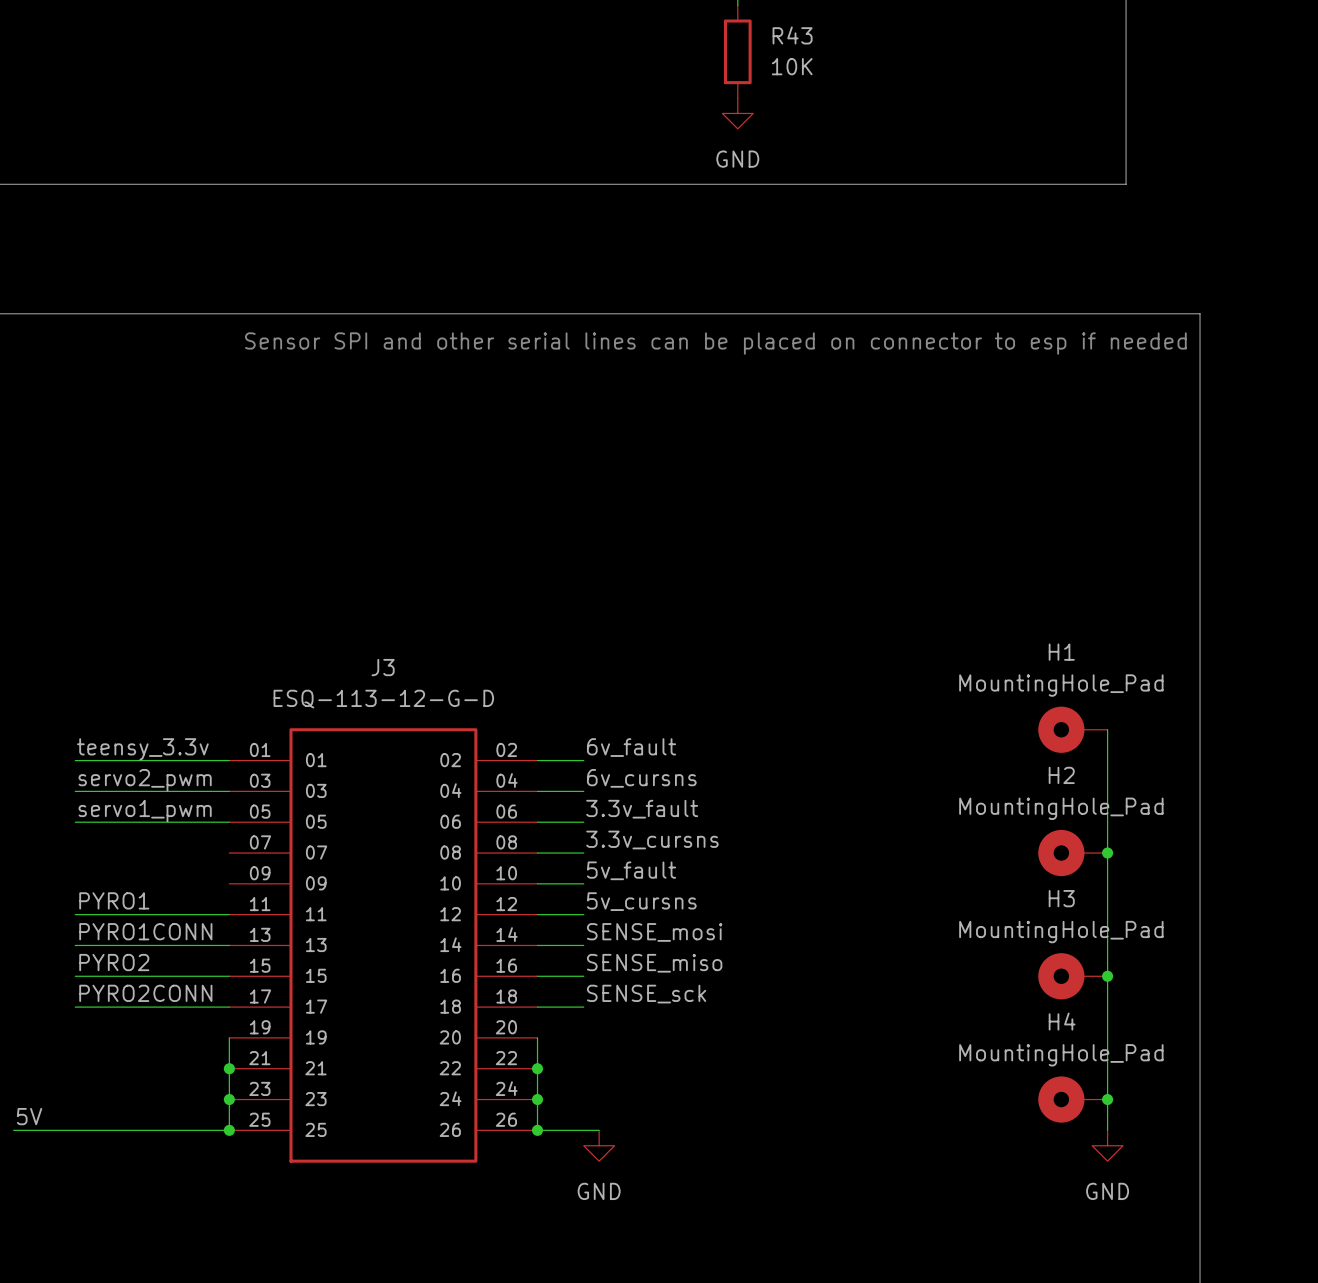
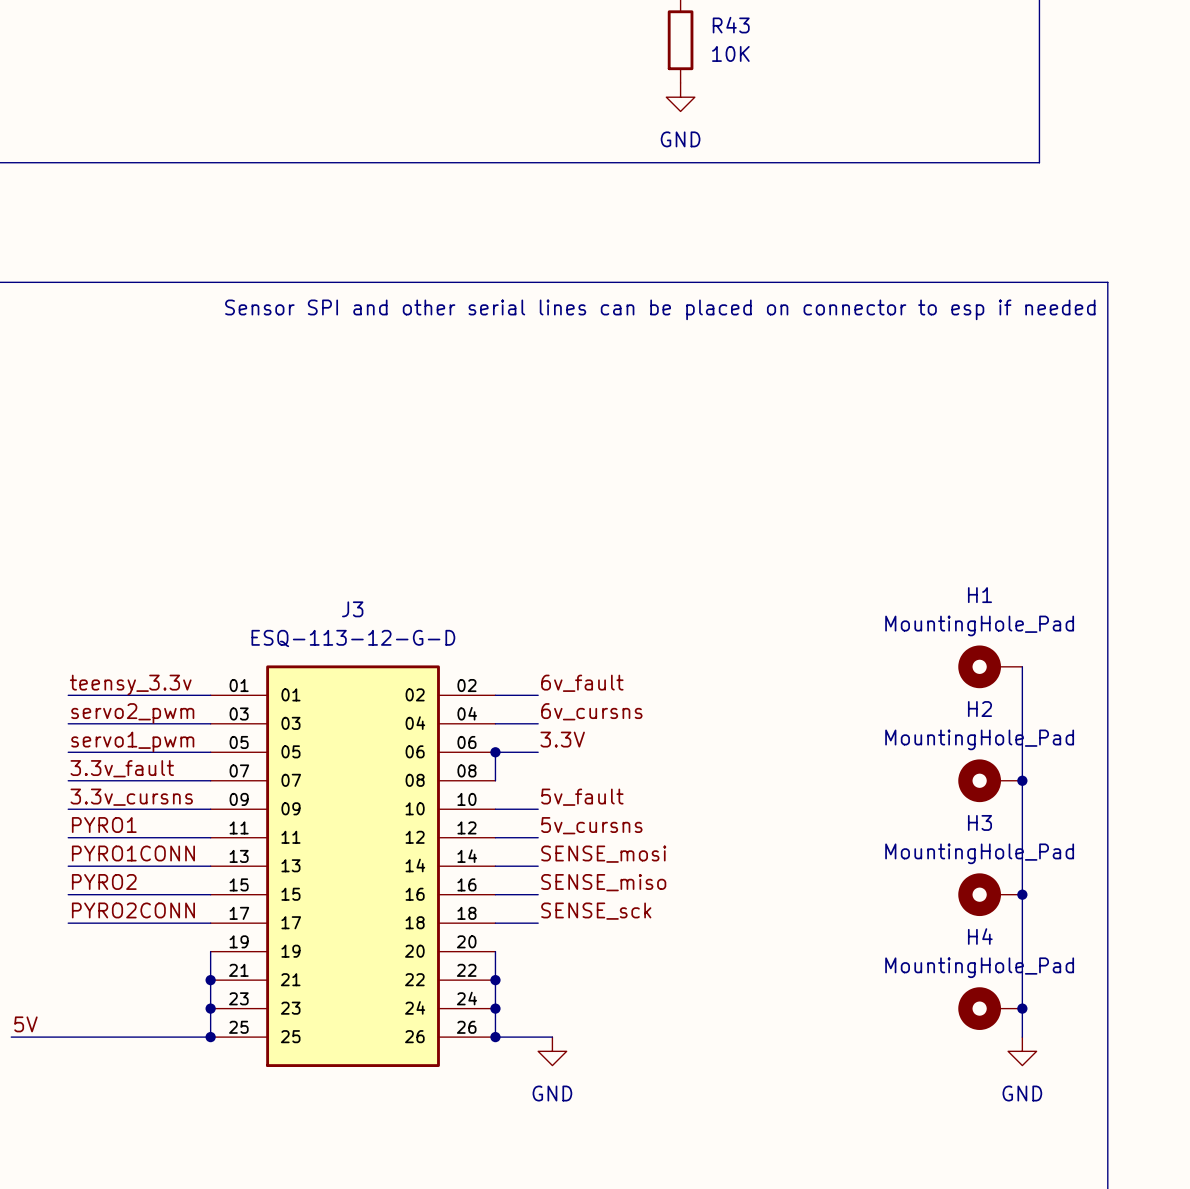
label: 3.3v_fault (642, 809) -> 3.3V (562, 739)
junction: none -> (495, 752)
label: none -> 3.3v_fault (122, 768)
label: 3.3v_cursns (652, 840) -> none
wire: none -> (68, 780) (210, 780)
wire: (537, 853) (583, 853) -> (495, 780) (495, 752)
label: none -> 3.3v_cursns (131, 797)
wire: none -> (68, 809) (210, 809)

